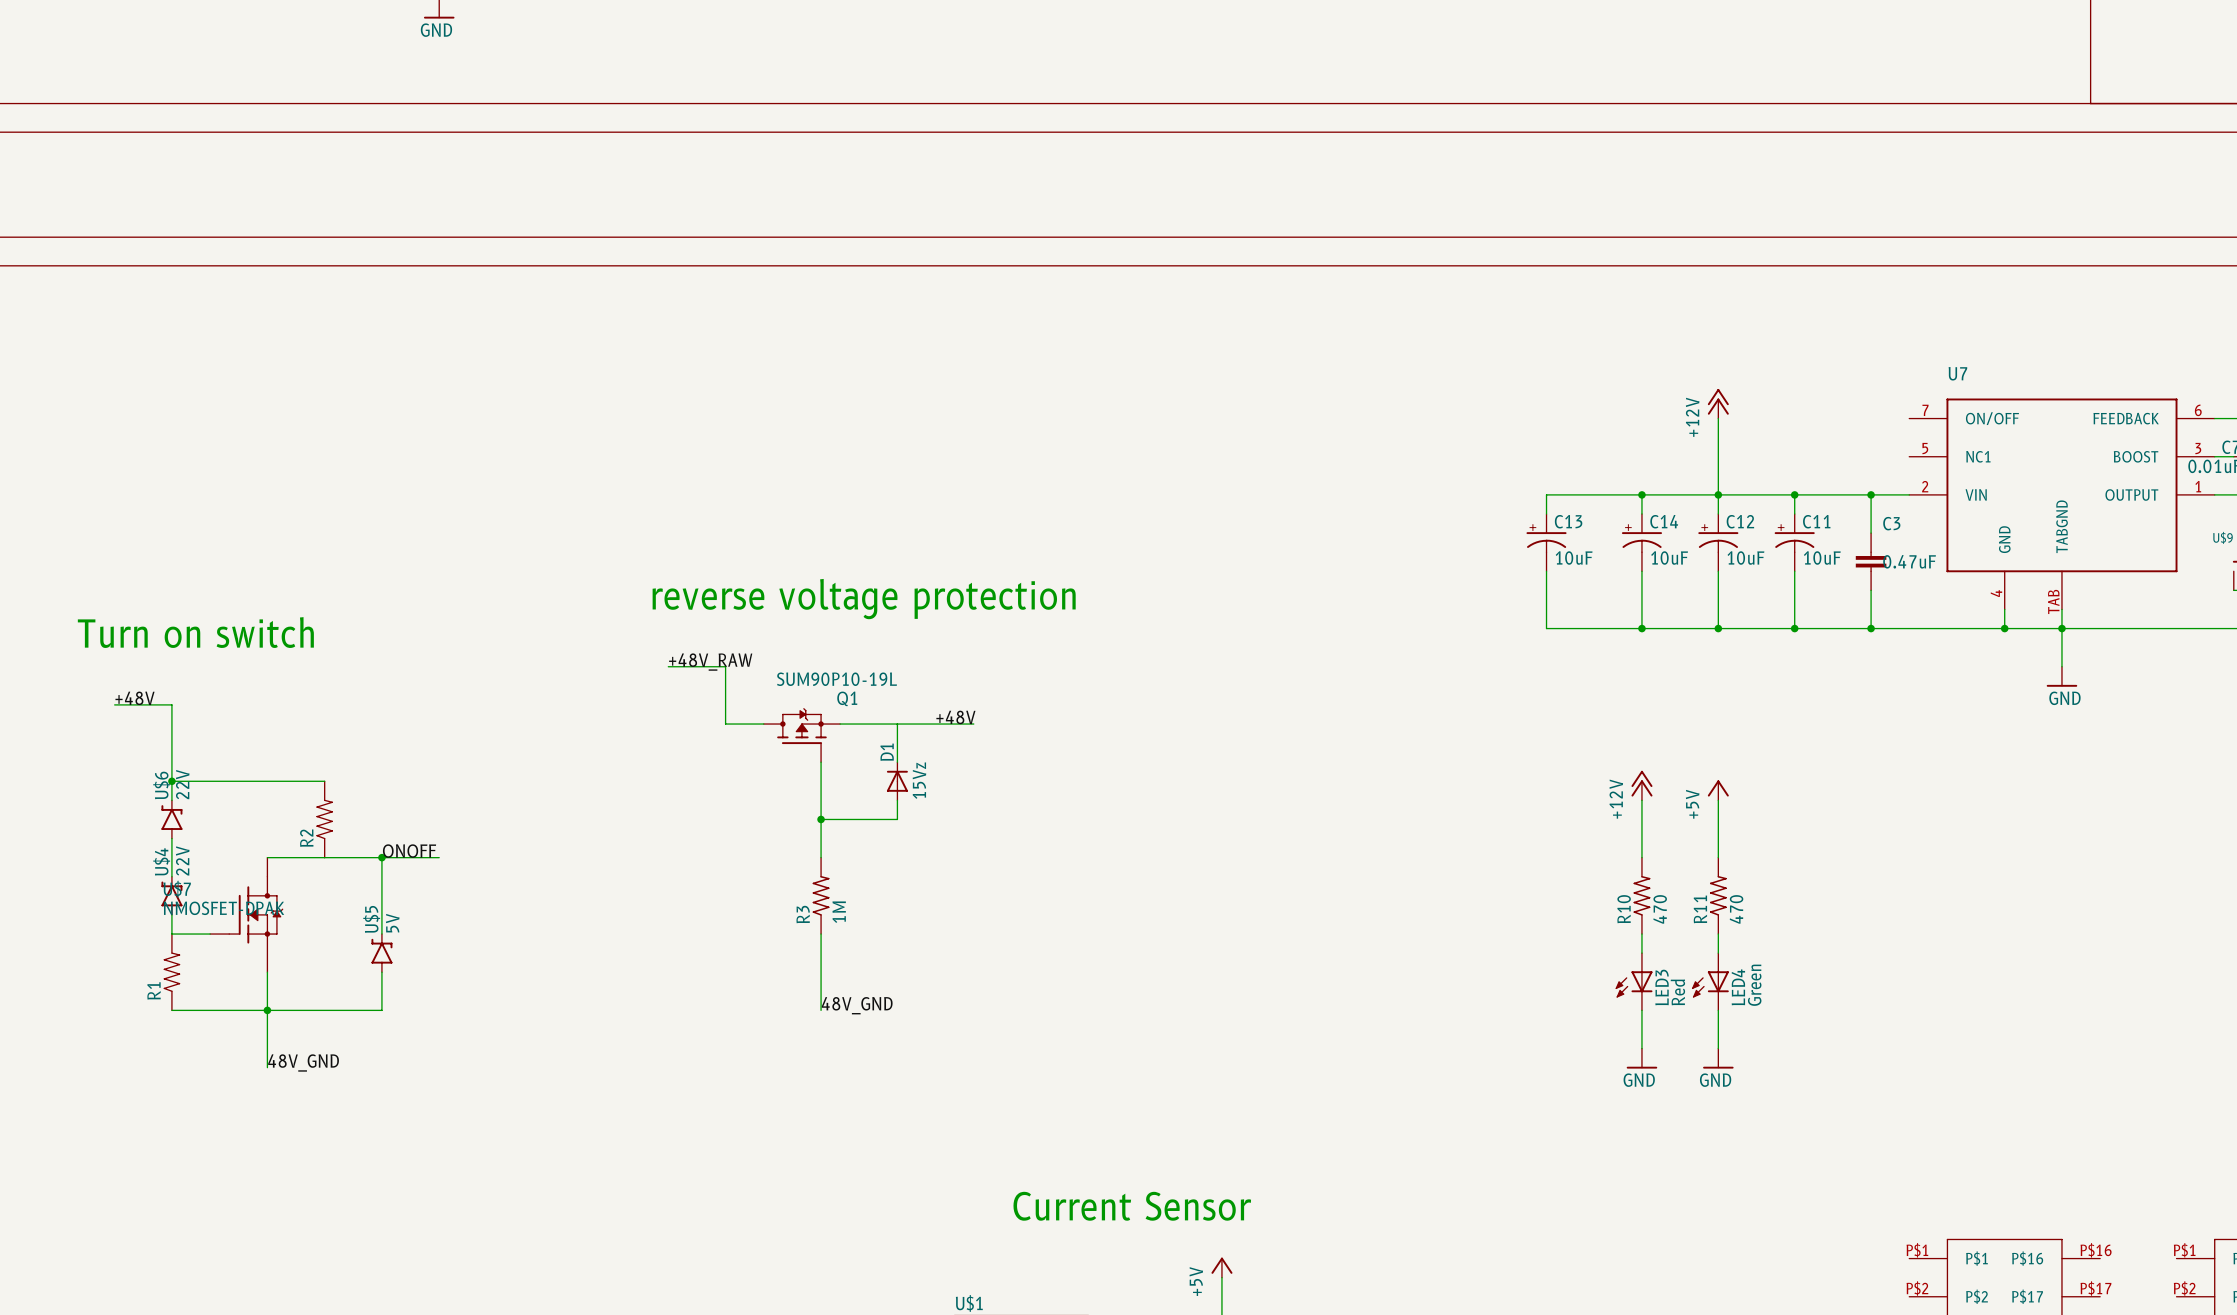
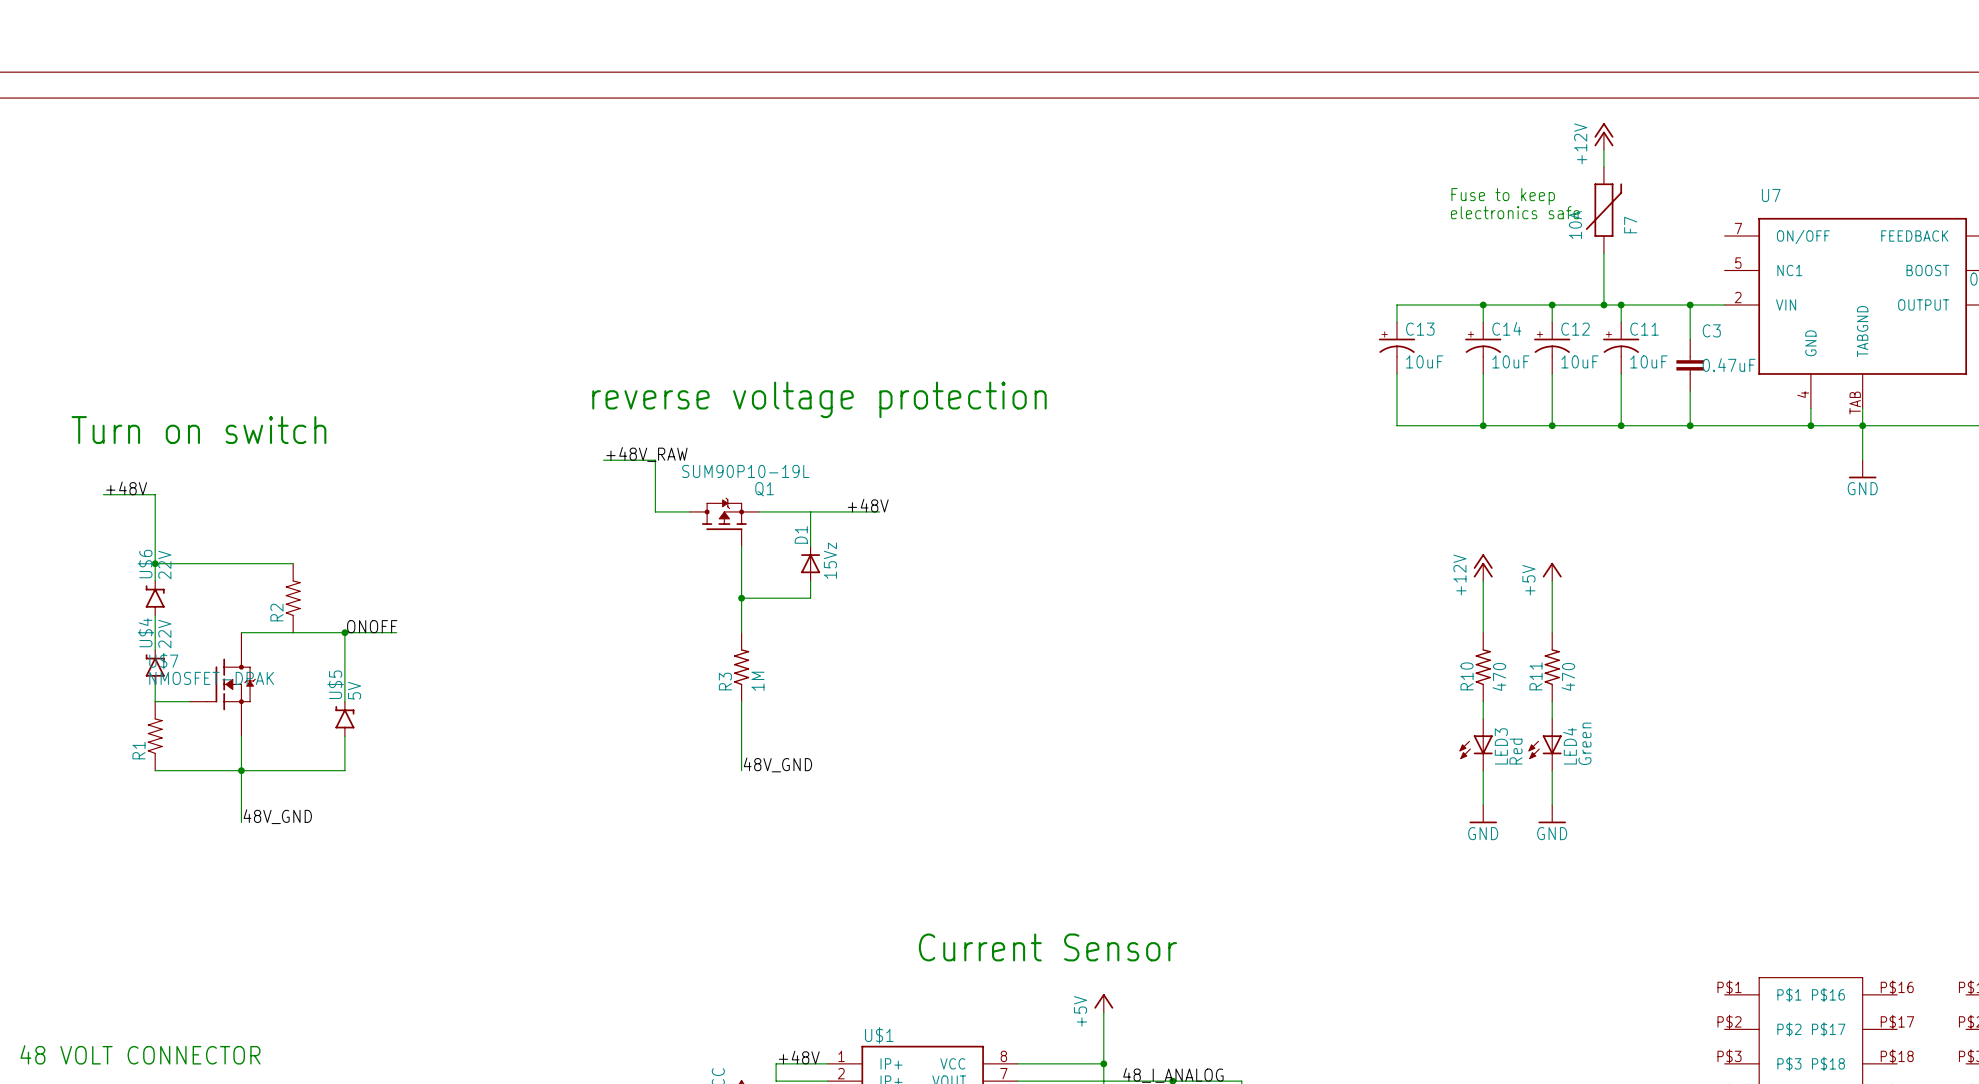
wire: none -> (1603, 149) (1603, 167)
text: none -> Fuse to keep (1503, 196)
F7: none -> 10A (1603, 210)
text: none -> electronics safe (1515, 212)
power symbol position: +12V (1718, 403) -> +12V (1603, 136)
wire: (1718, 418) (1718, 494) -> none
wire: none -> (1603, 253) (1603, 305)
junction: none -> (1603, 305)

